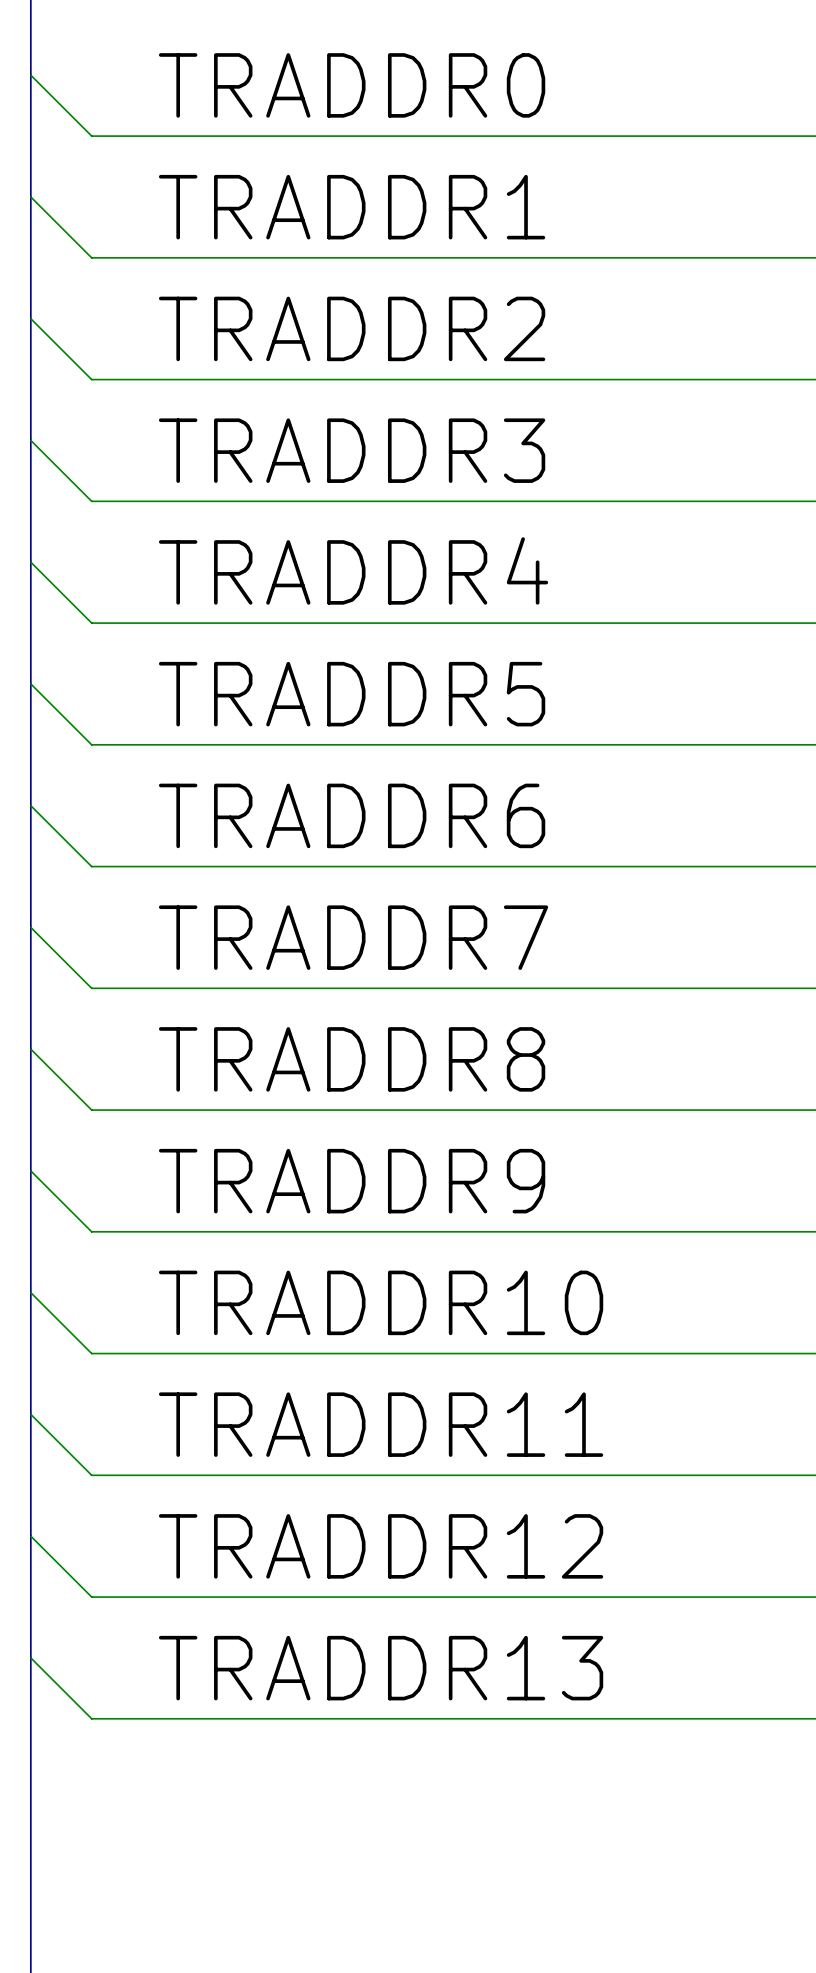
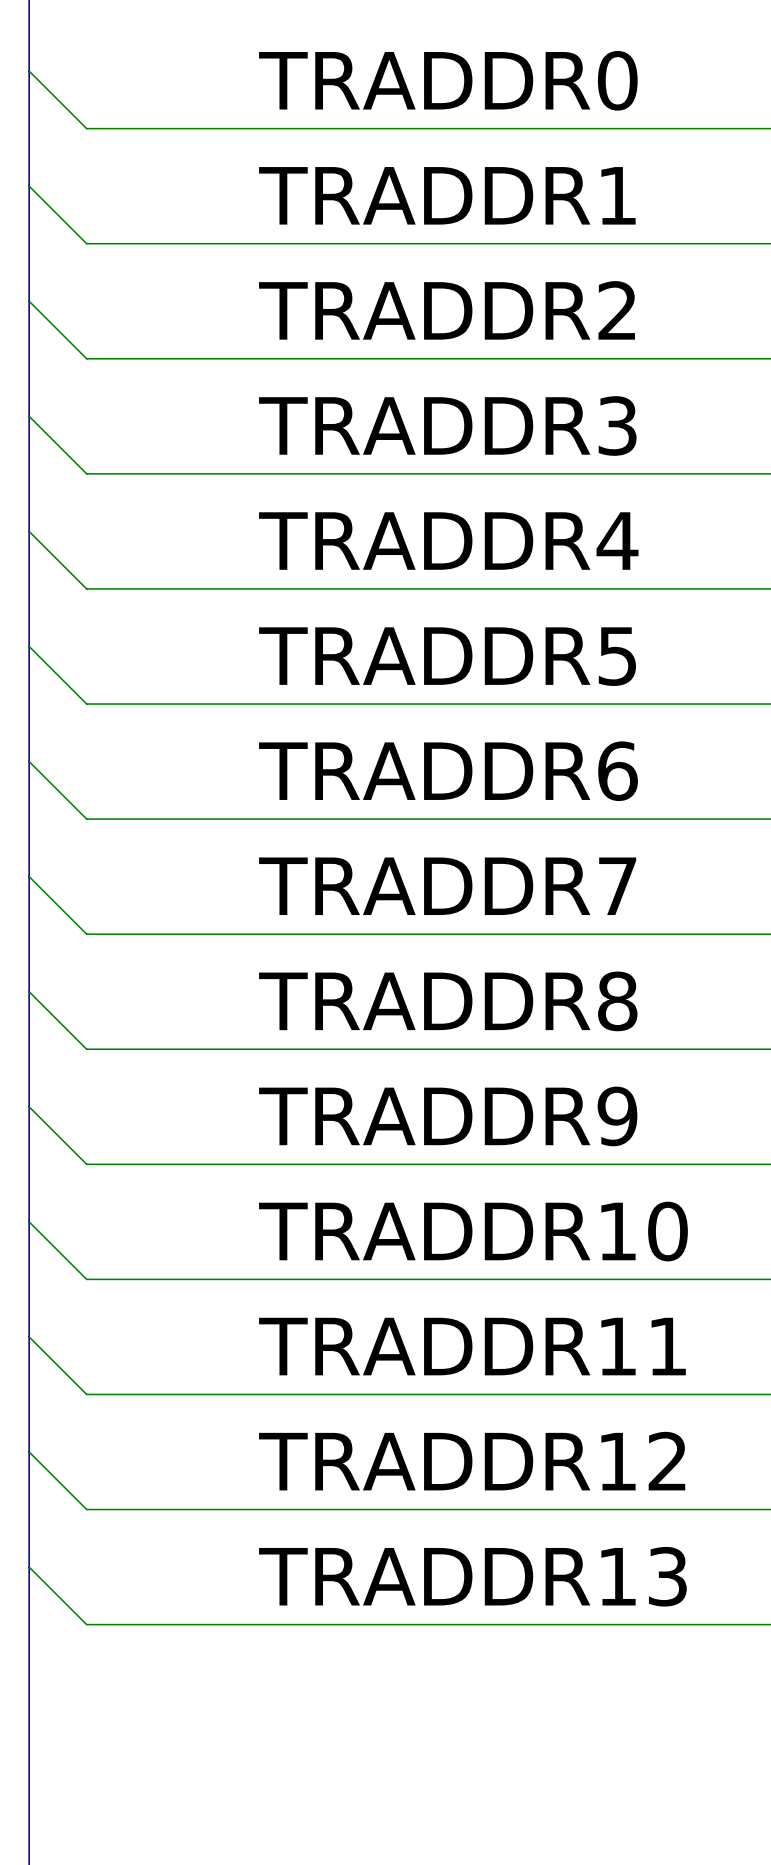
label position: TRADDR0 (352, 85) -> TRADDR0 (448, 80)
label position: TRADDR1 (352, 207) -> TRADDR1 (447, 195)
label position: TRADDR2 (352, 328) -> TRADDR2 (447, 310)
label position: TRADDR3 (352, 450) -> TRADDR3 (447, 426)
label position: TRADDR4 (353, 570) -> TRADDR4 (448, 541)
label position: TRADDR5 (352, 694) -> TRADDR5 (447, 656)
label position: TRADDR6 (352, 815) -> TRADDR6 (448, 771)
label position: TRADDR7 (353, 937) -> TRADDR7 (447, 886)
label position: TRADDR8 (352, 1059) -> TRADDR8 (448, 1001)
label position: TRADDR9 (352, 1181) -> TRADDR9 (448, 1116)
label position: TRADDR10 (381, 1302) -> TRADDR10 (473, 1231)
label position: TRADDR11 (381, 1424) -> TRADDR11 (472, 1346)
label position: TRADDR12 (381, 1546) -> TRADDR12 (472, 1461)
label position: TRADDR13 (381, 1668) -> TRADDR13 (472, 1576)

